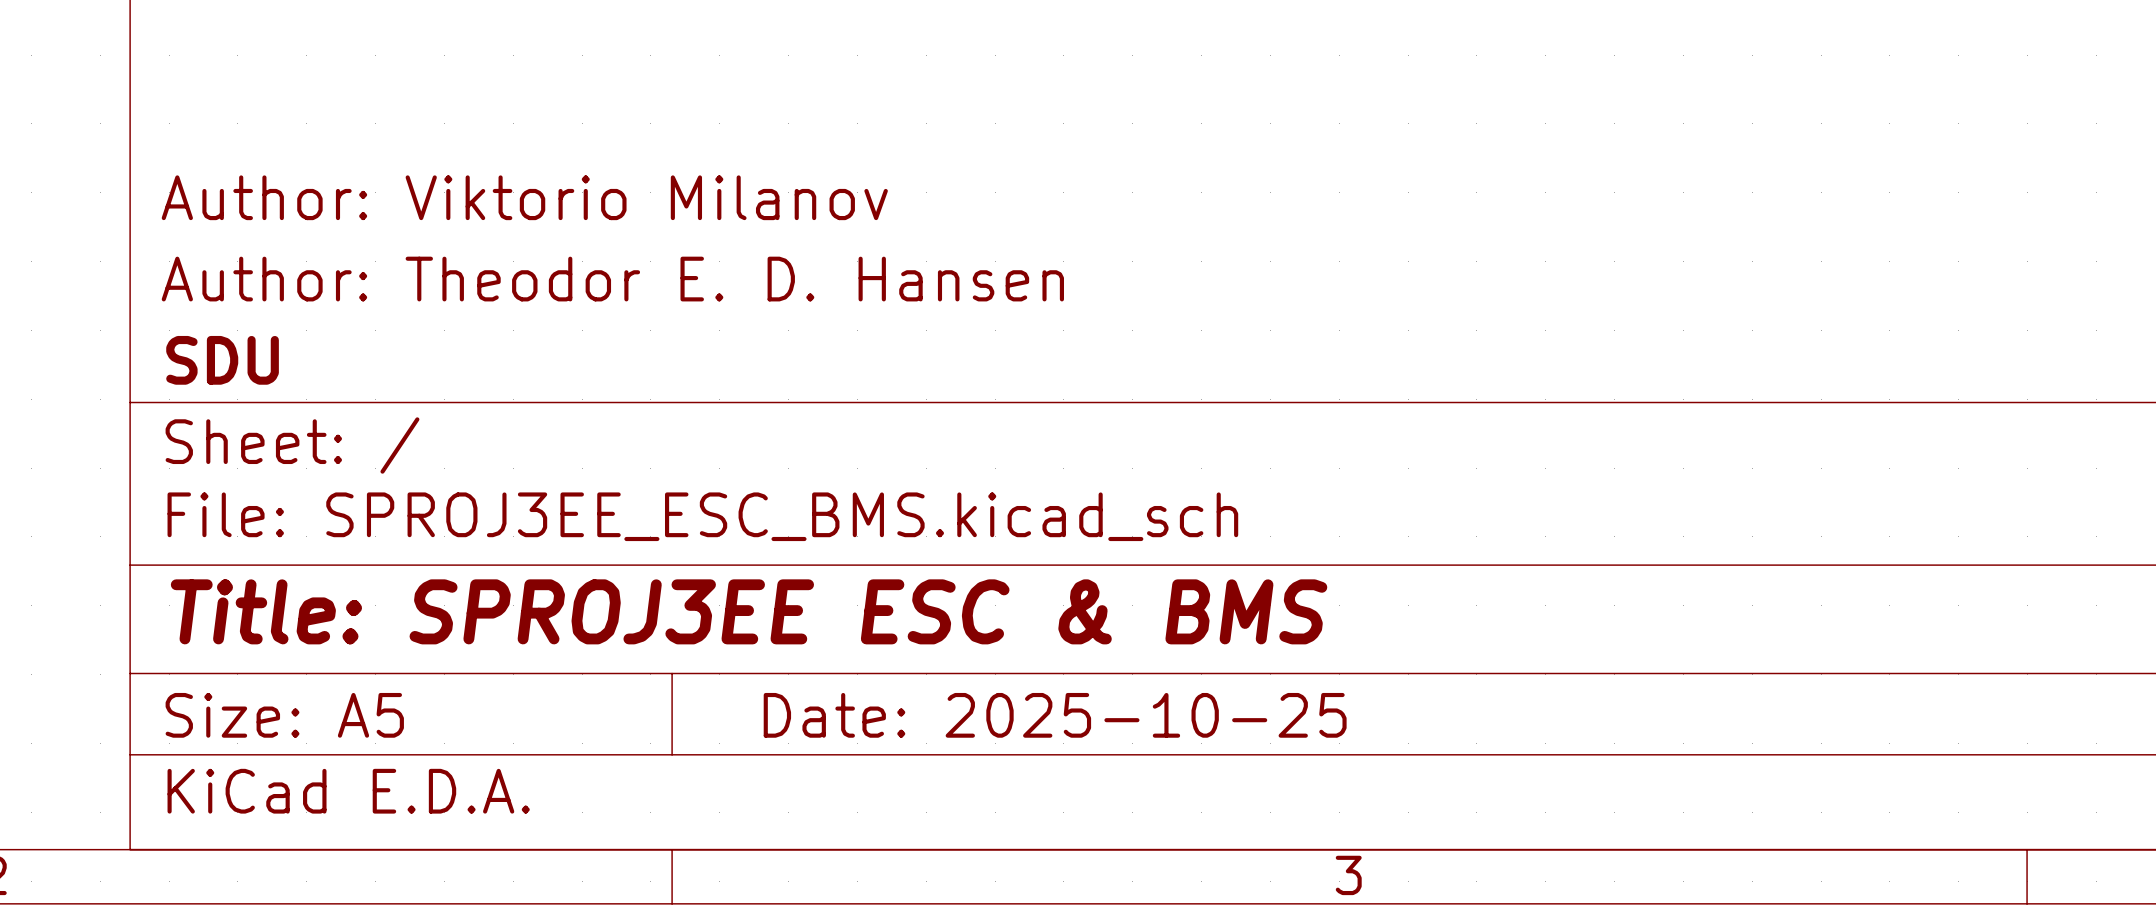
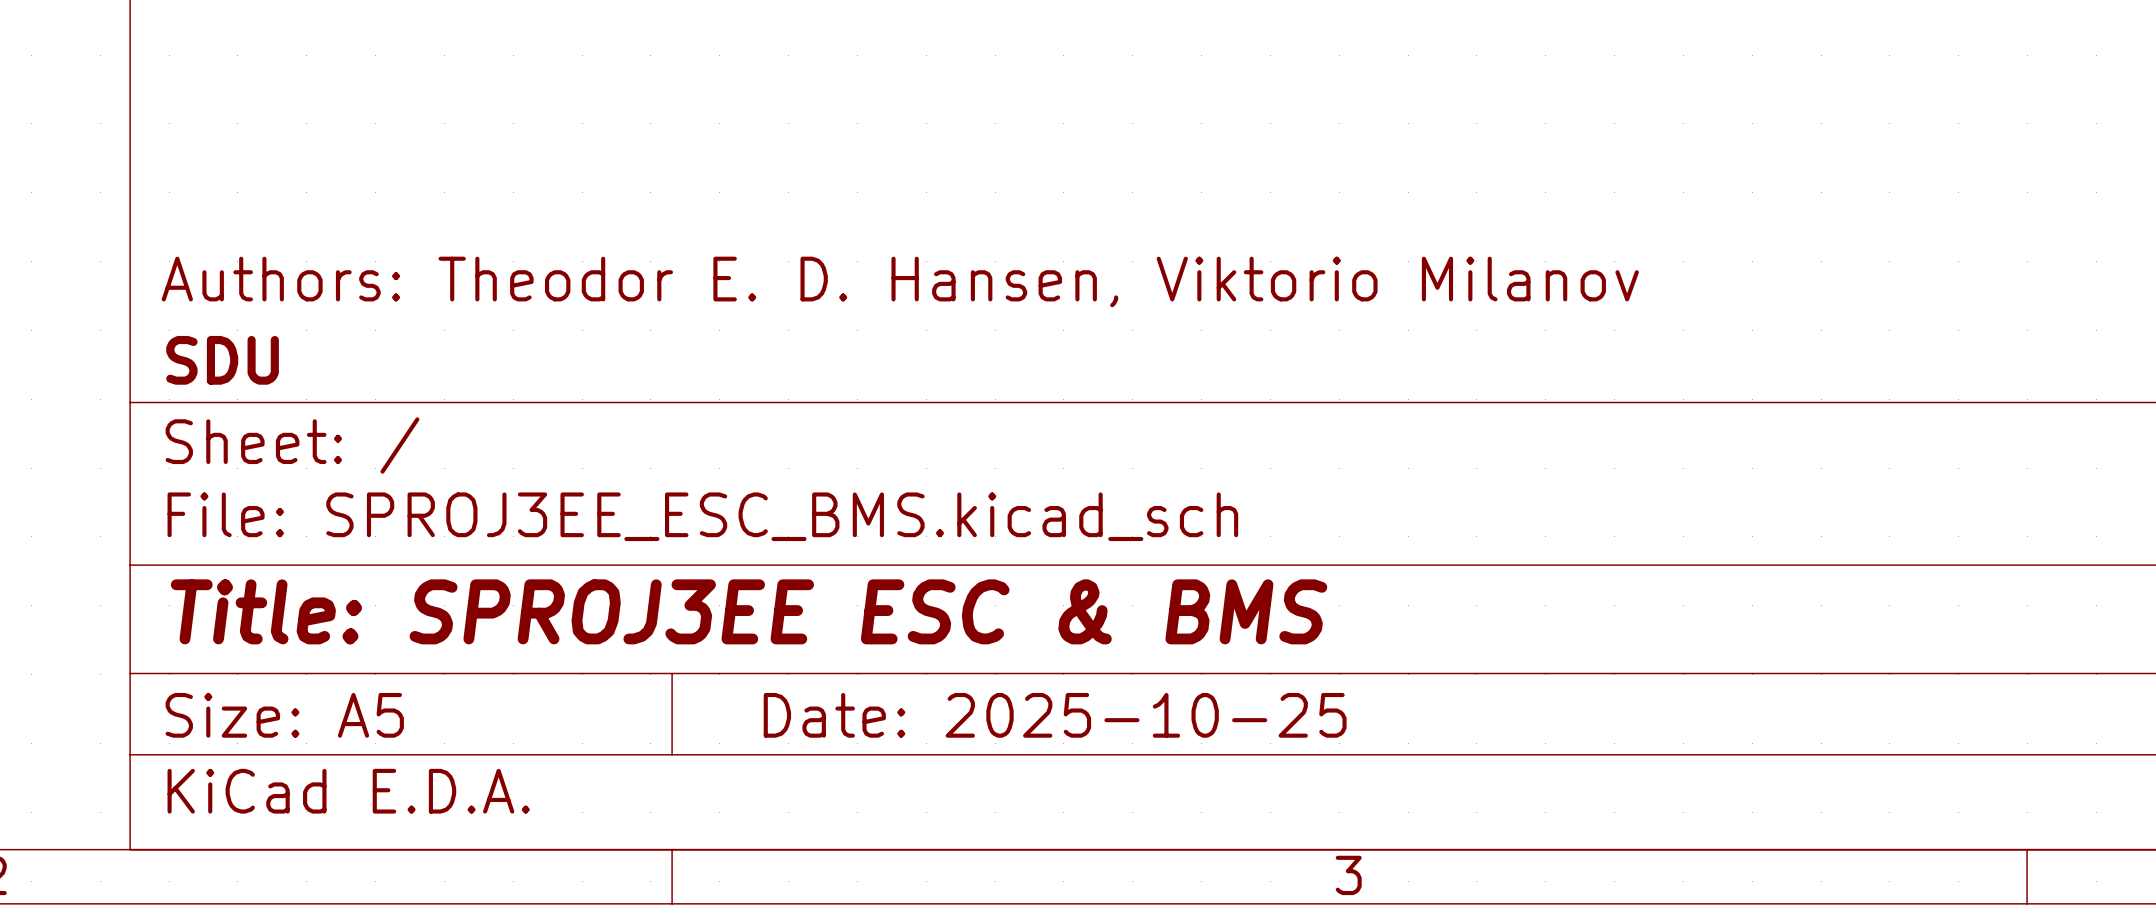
title block: Author: Viktorio Milanov (524, 197) -> none
title block: Author: Theodor E. D. Hansen (612, 279) -> Authors: Theodor E. D. Hansen, Viktorio Milanov (900, 281)

